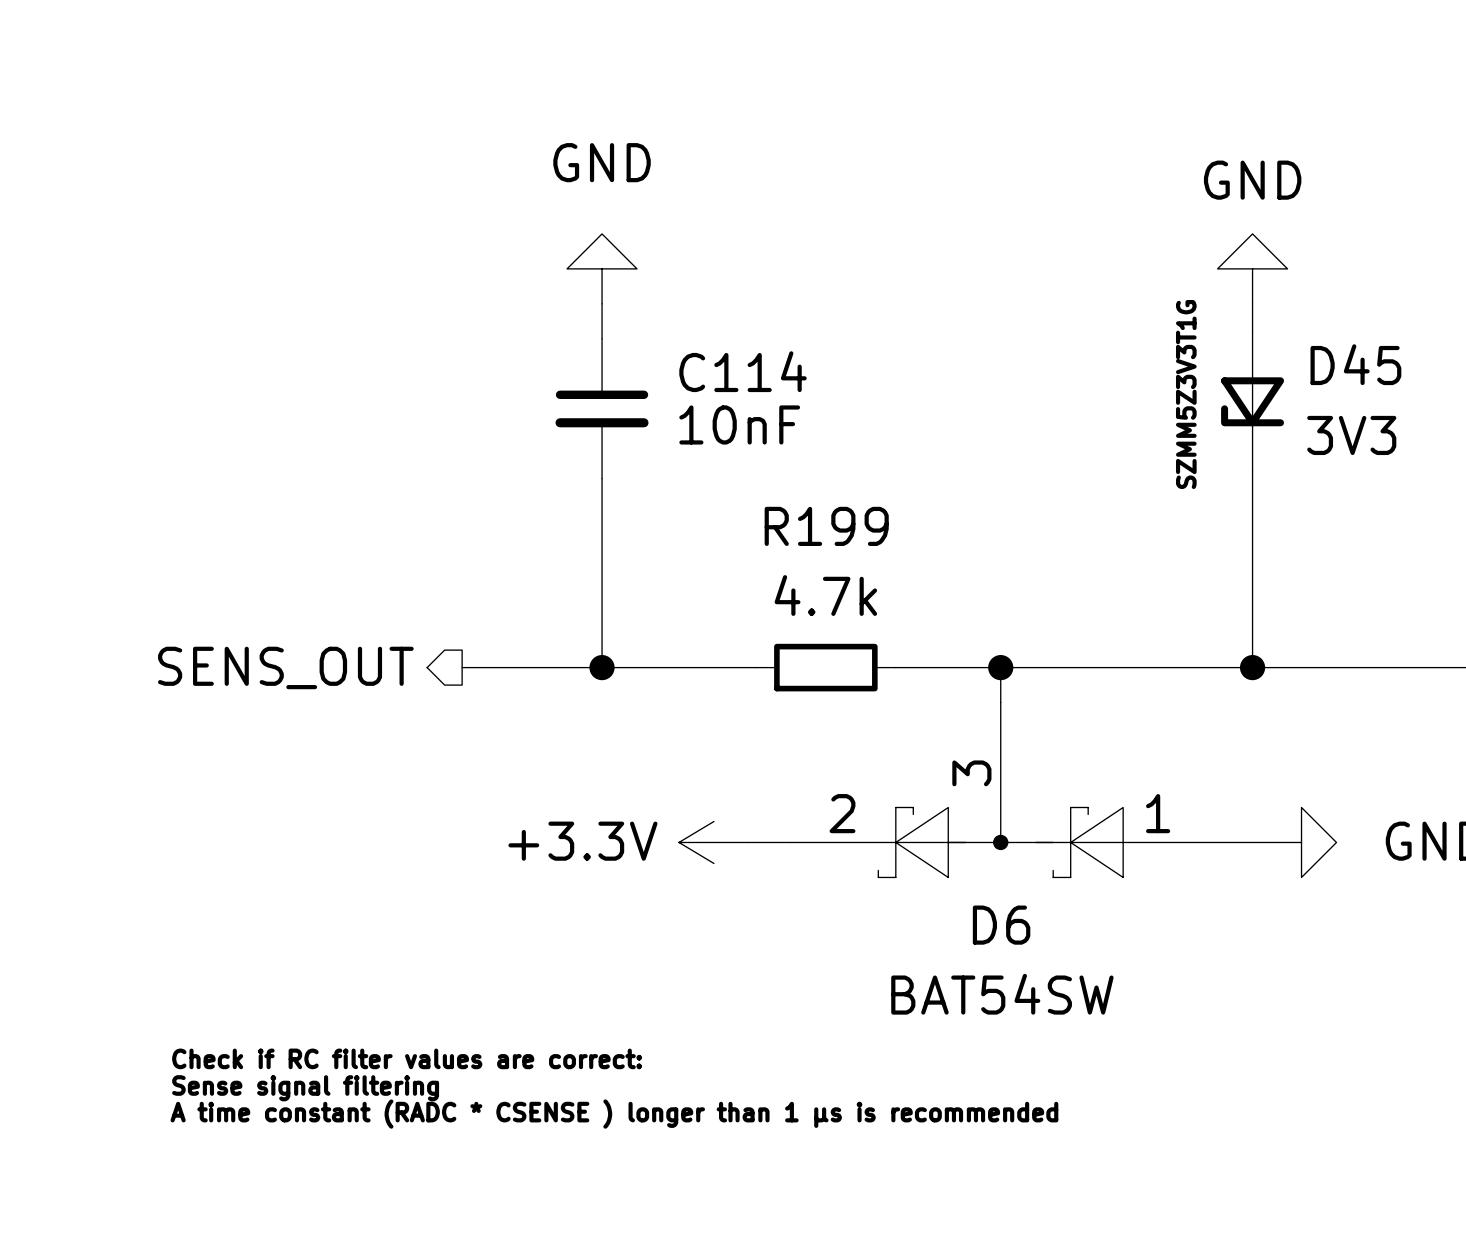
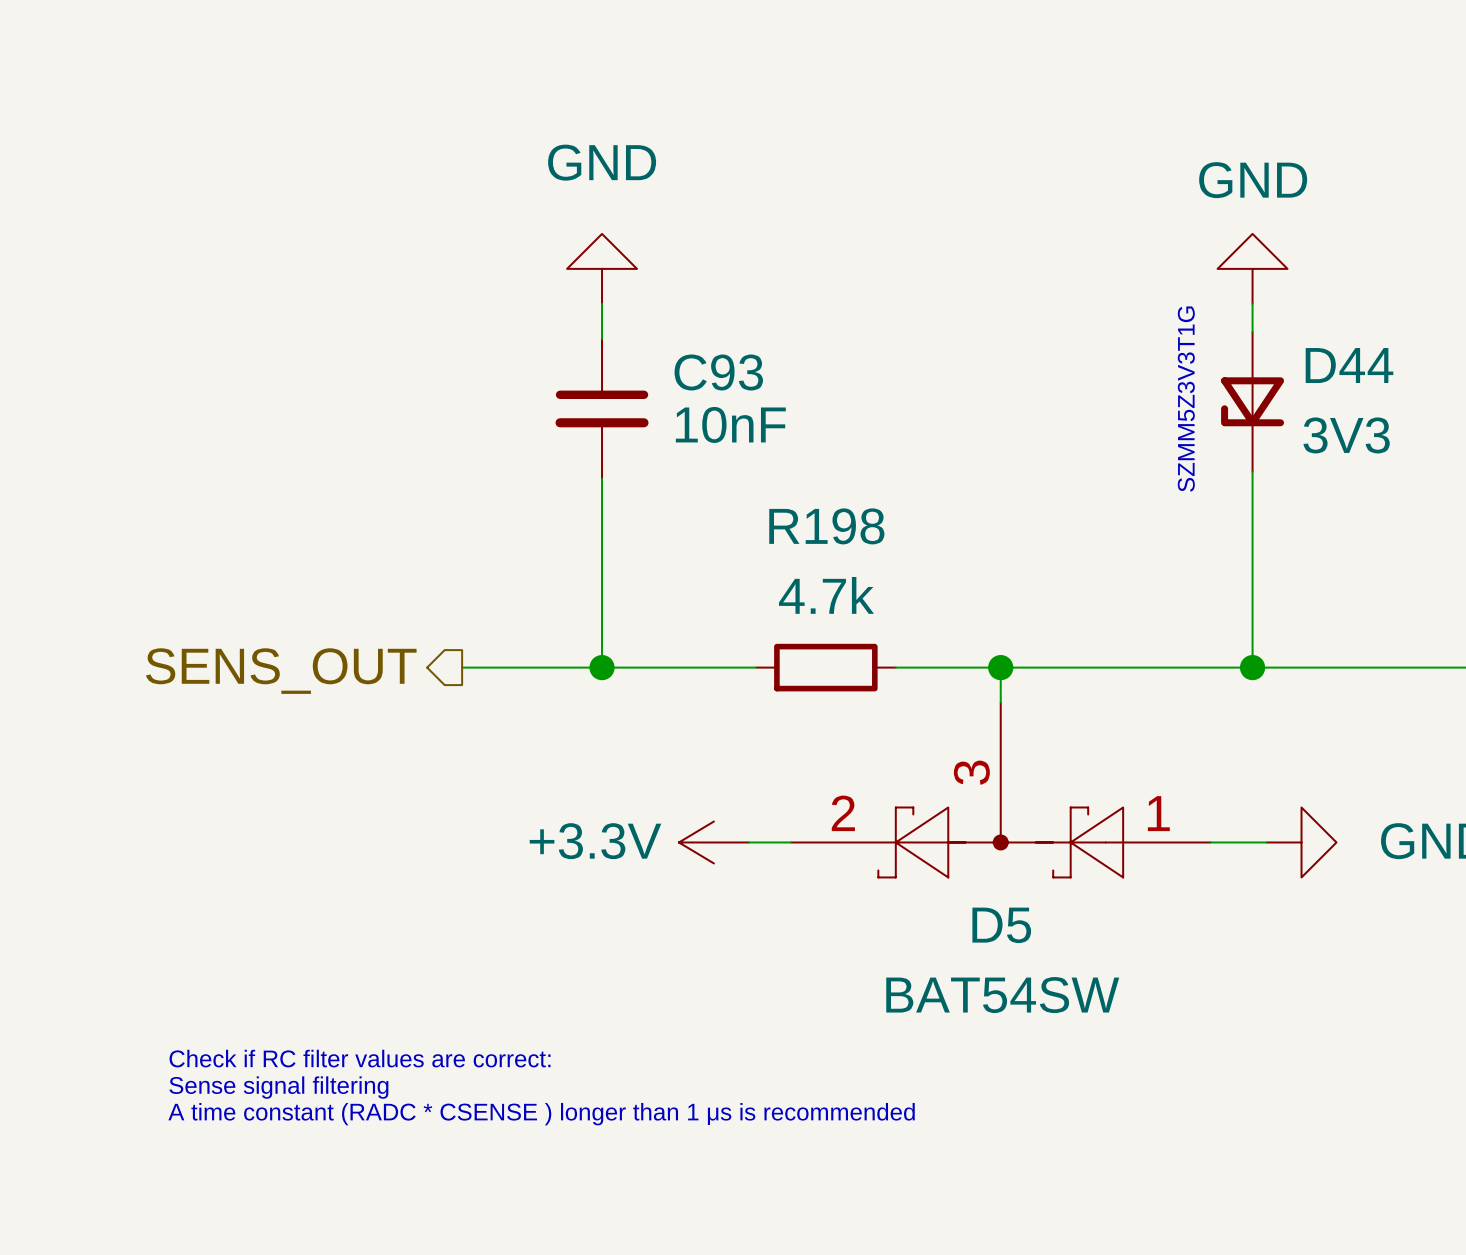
D45 name: D45 (1355, 364) -> D44 (1349, 365)
C114 name: C114 (743, 371) -> C93 (718, 372)
R199 name: R199 (826, 526) -> R198 (826, 526)
D6 name: D6 (1001, 925) -> D5 (1001, 925)

